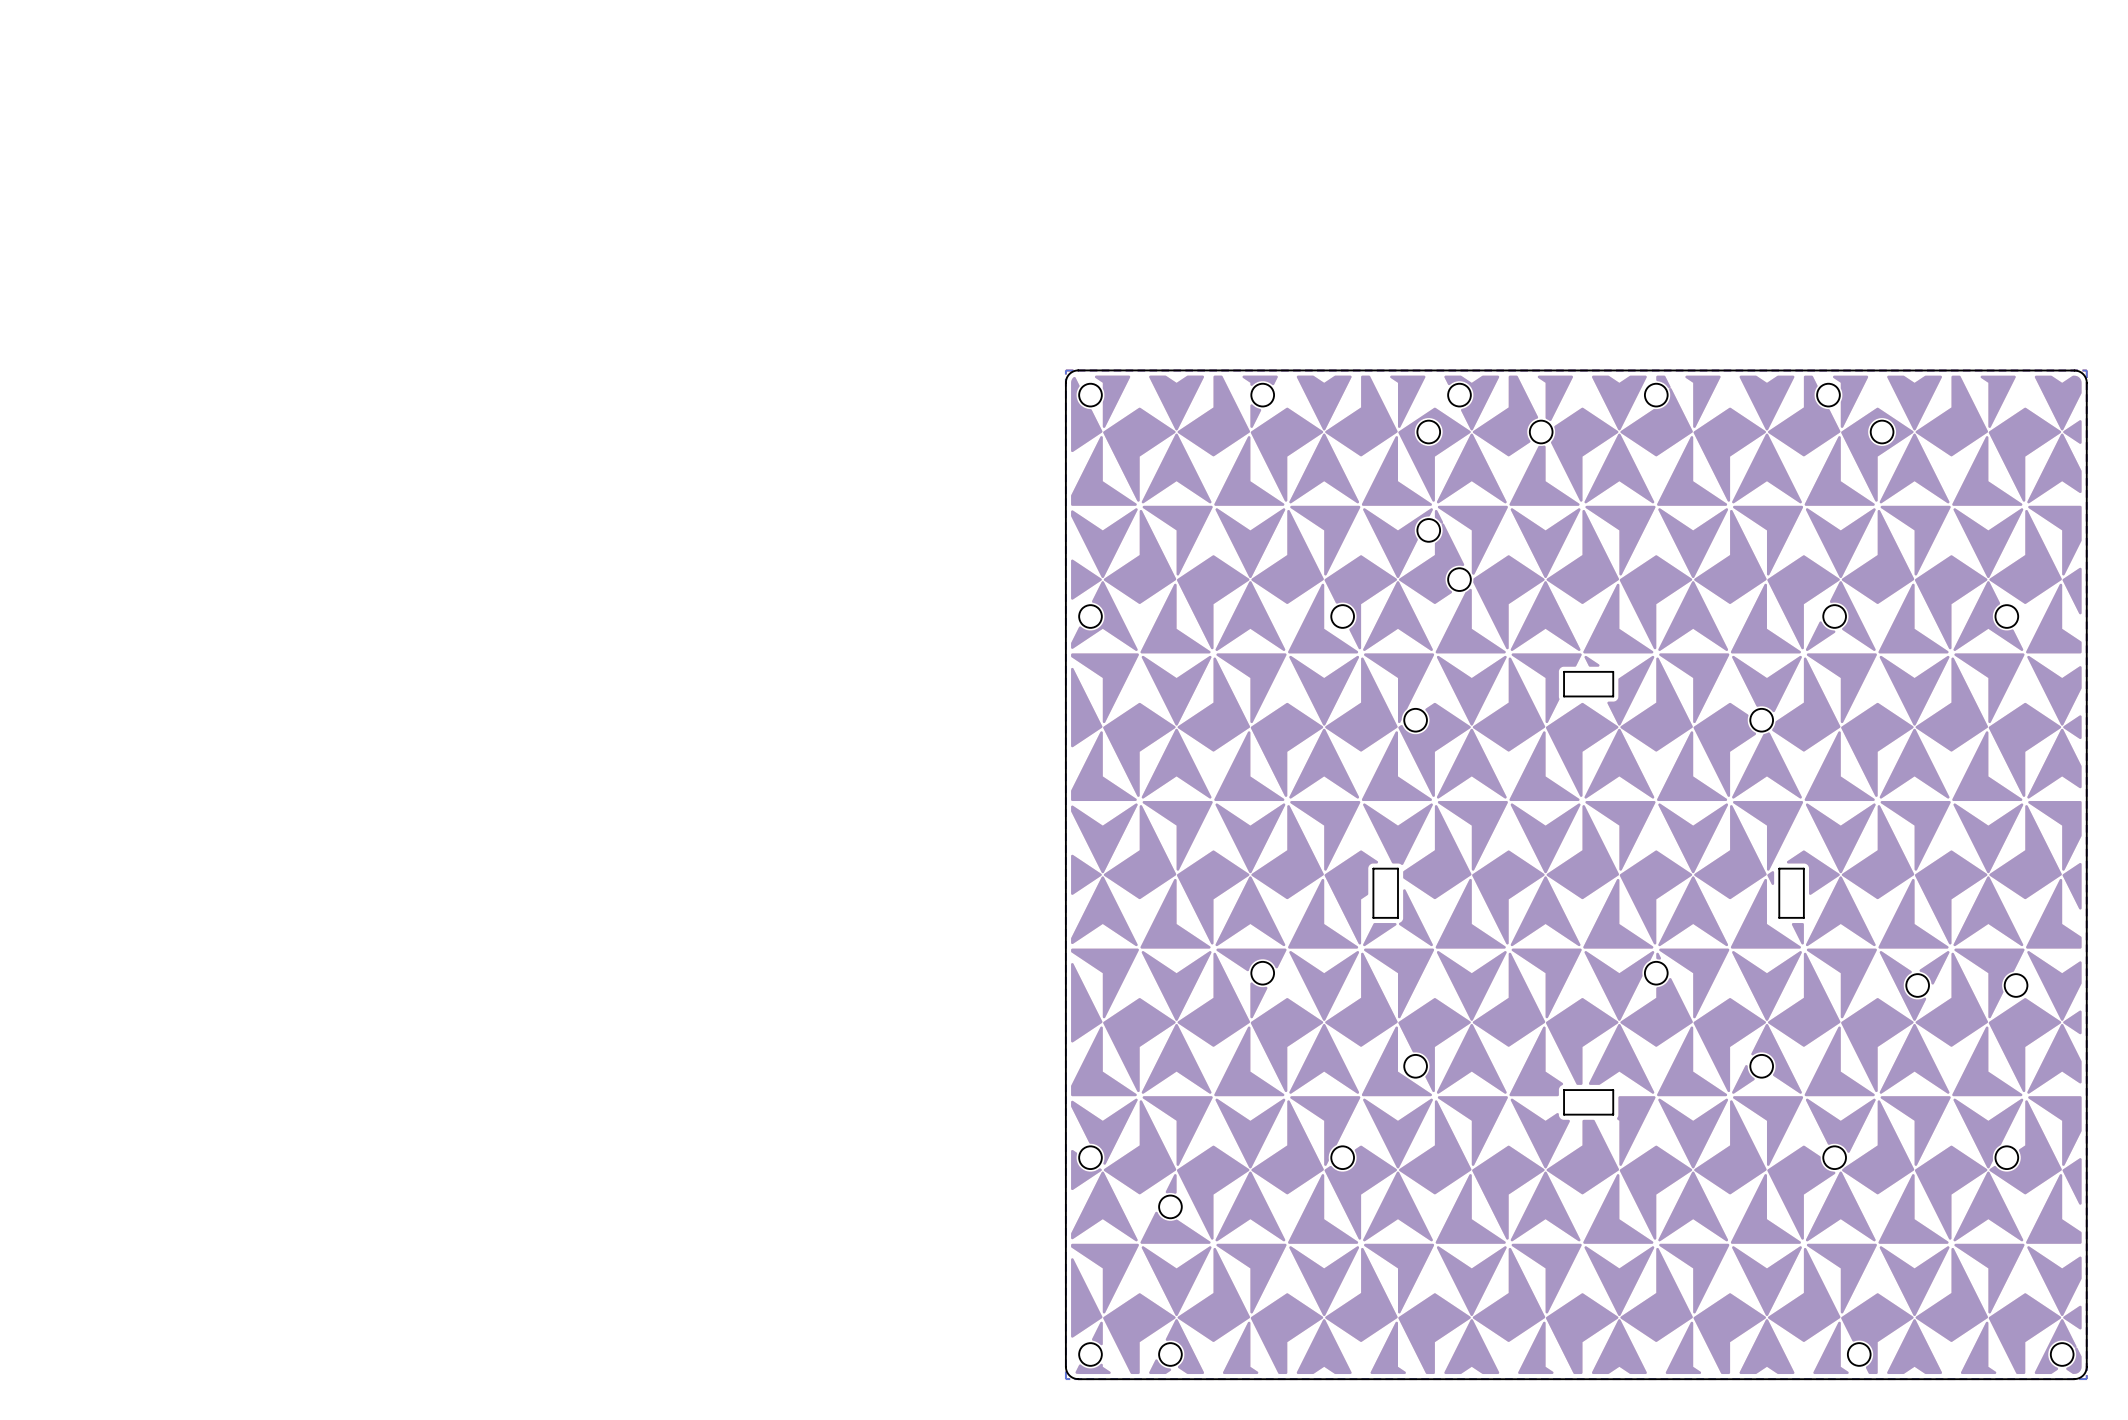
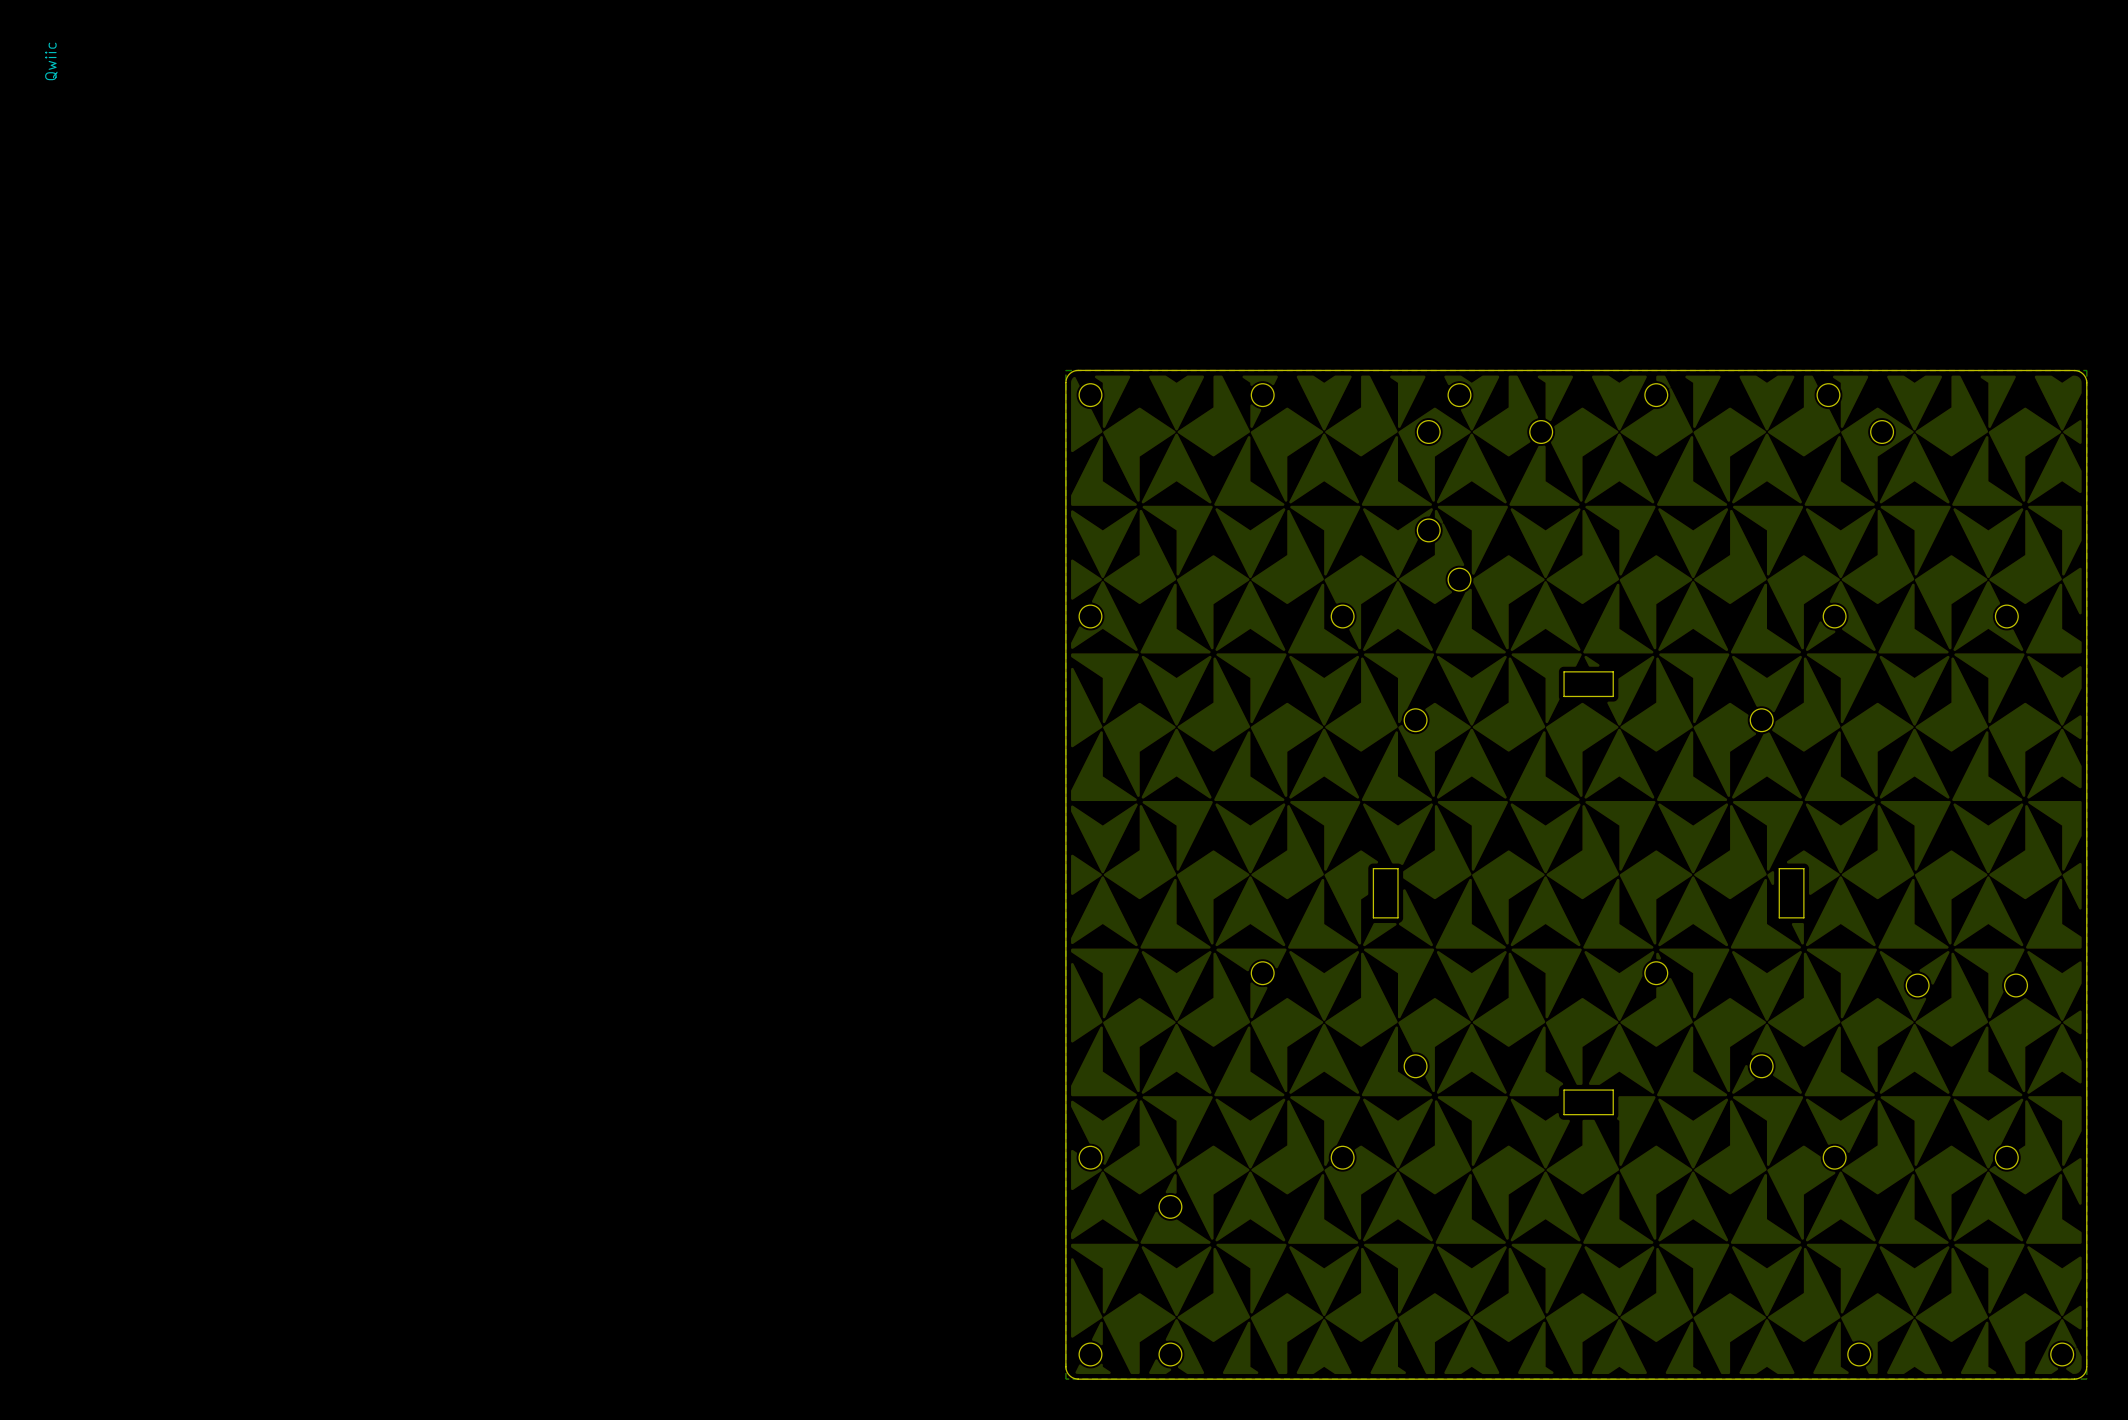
text: none -> Qwiic (51, 61)

